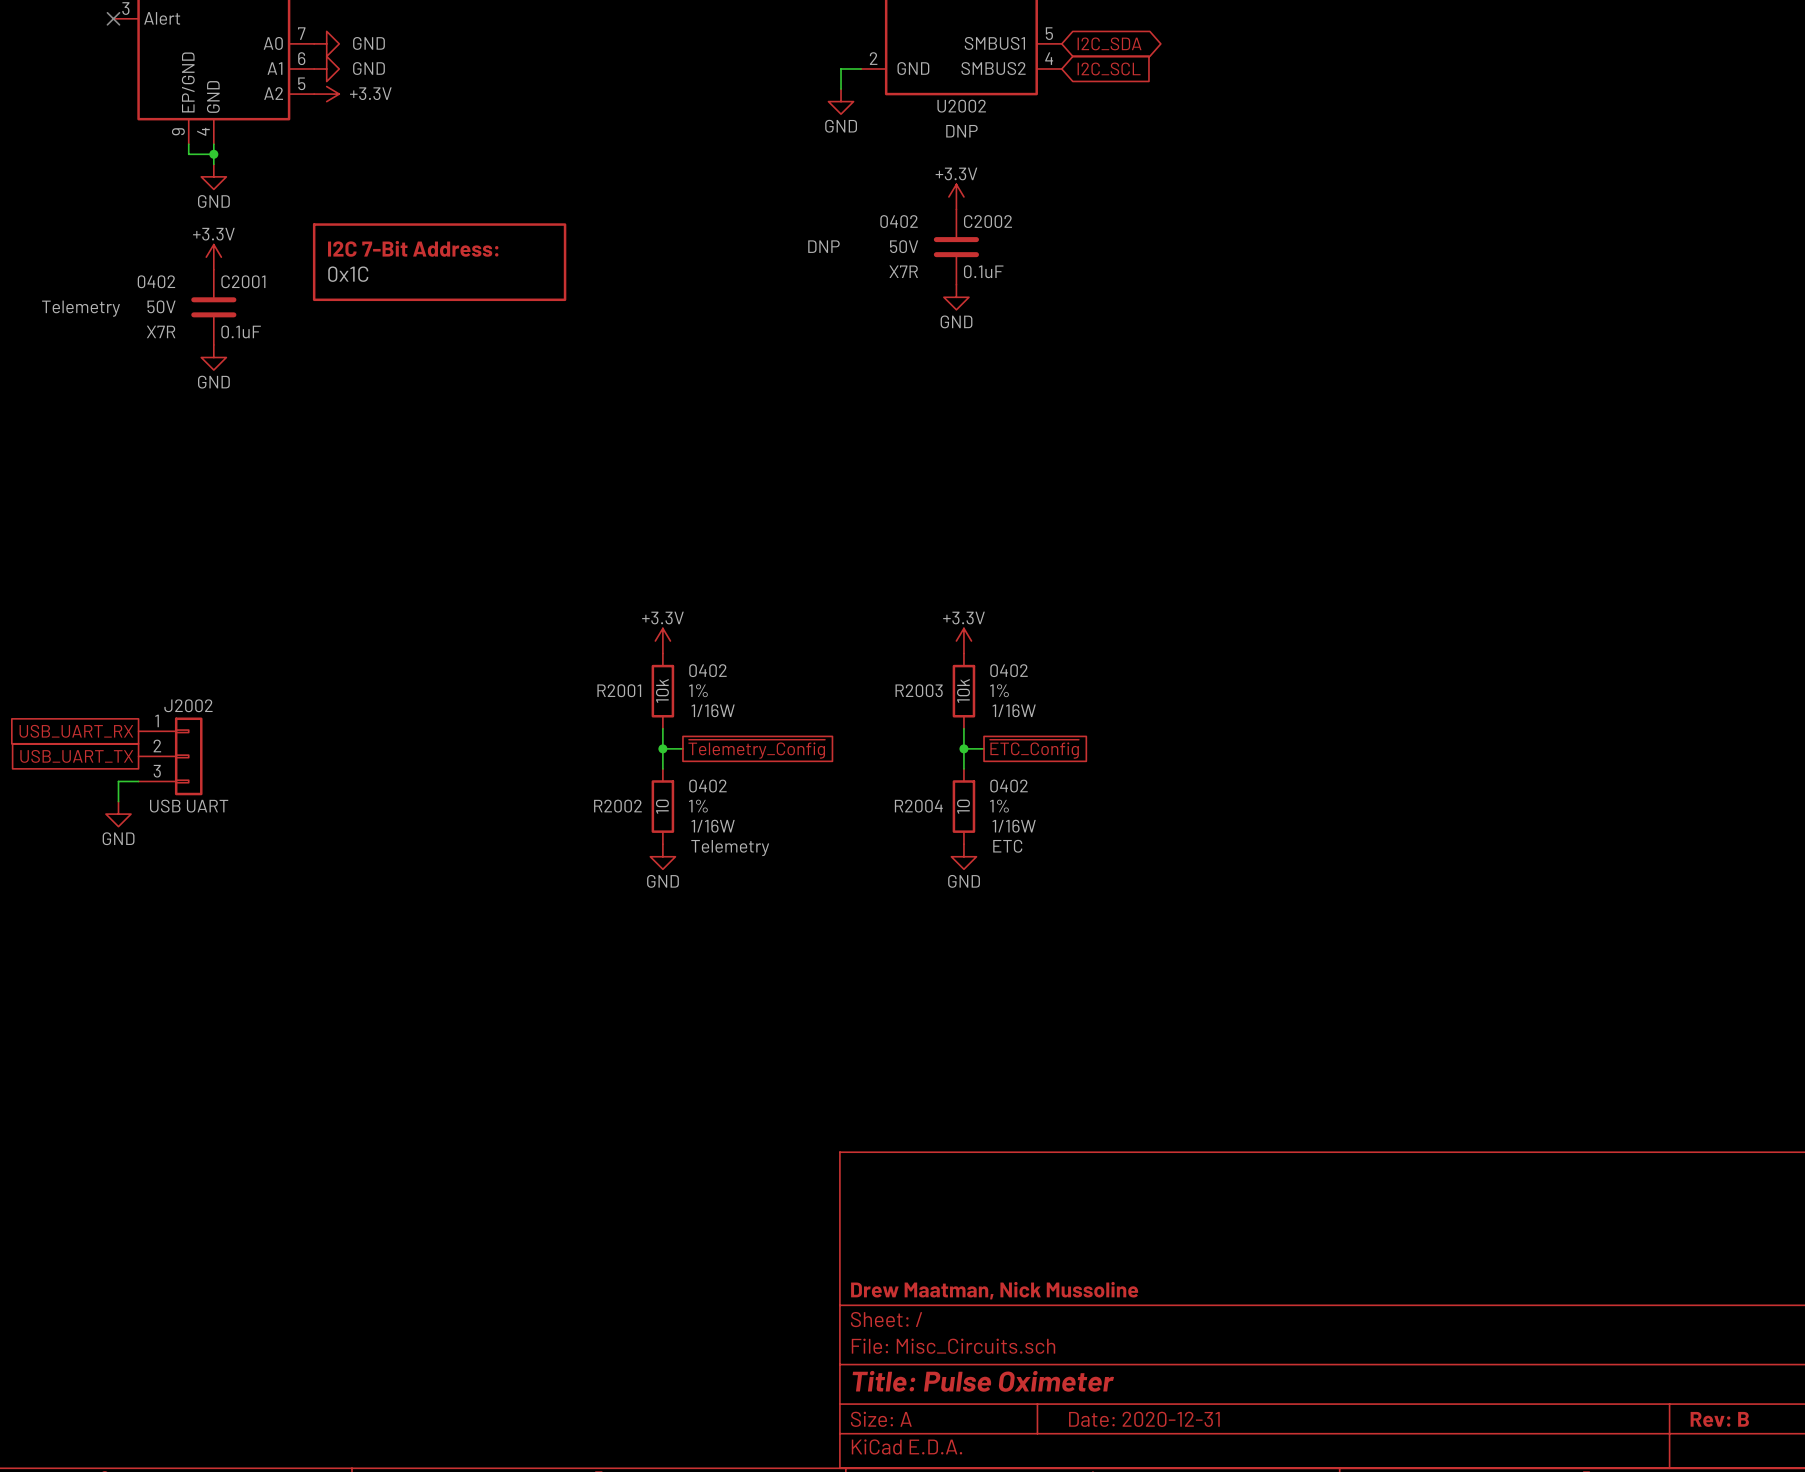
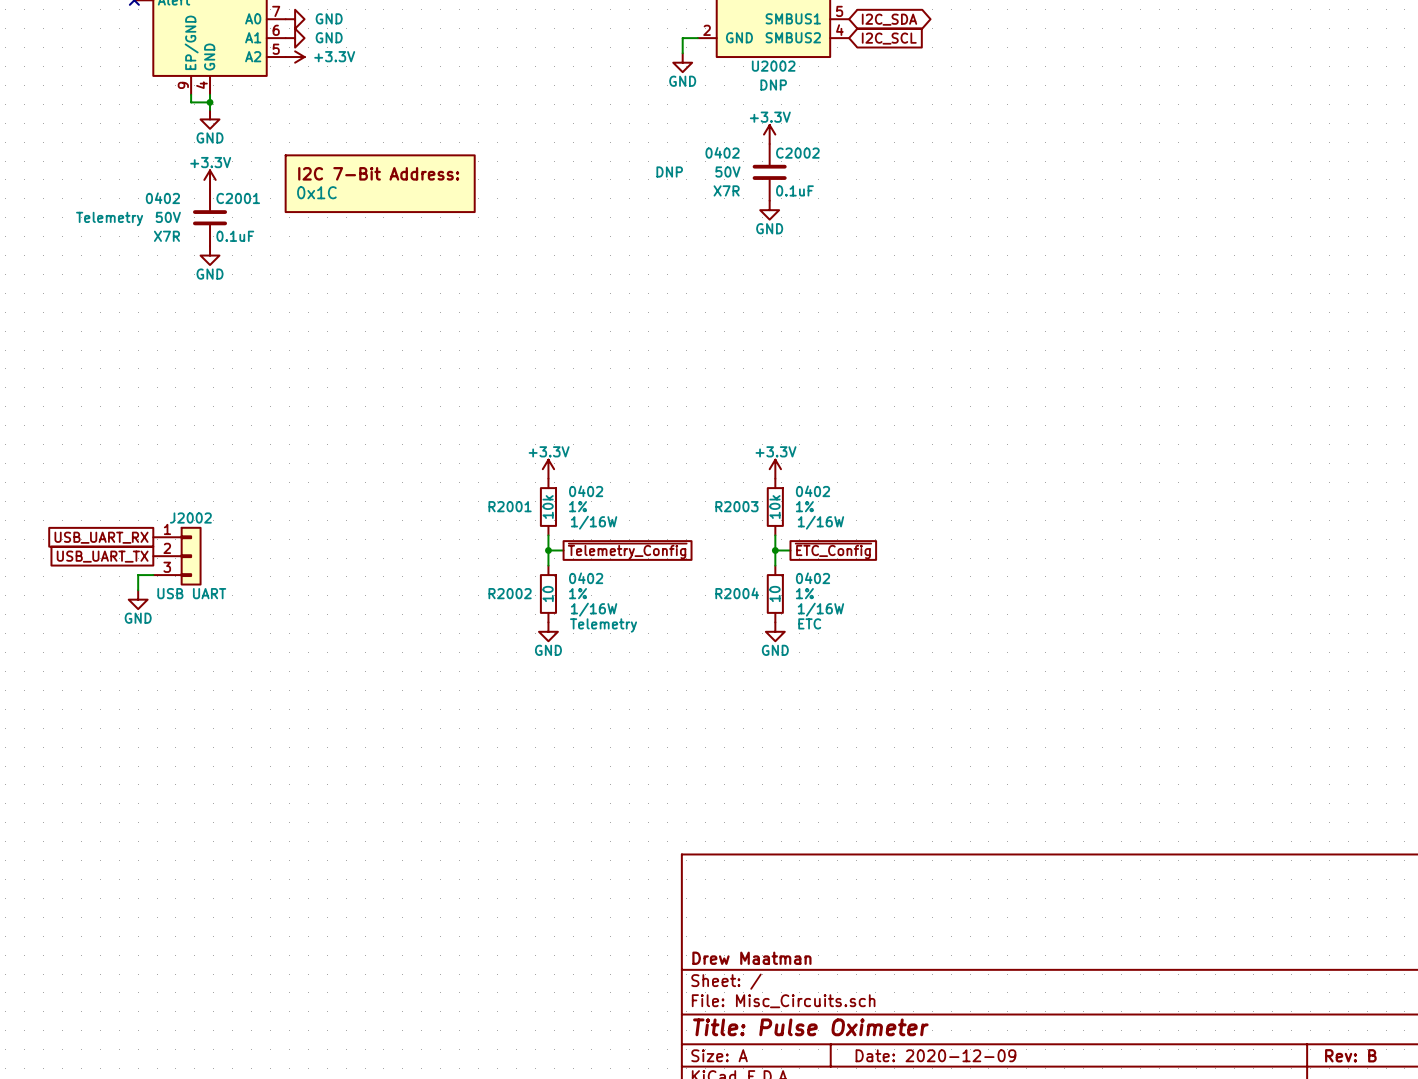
title block: Drew Maatman, Nick Mussoline (994, 1290) -> Drew Maatman (751, 958)
title block: Date: 2020-12-31 (1144, 1419) -> Date: 2020-12-09 (935, 1055)

